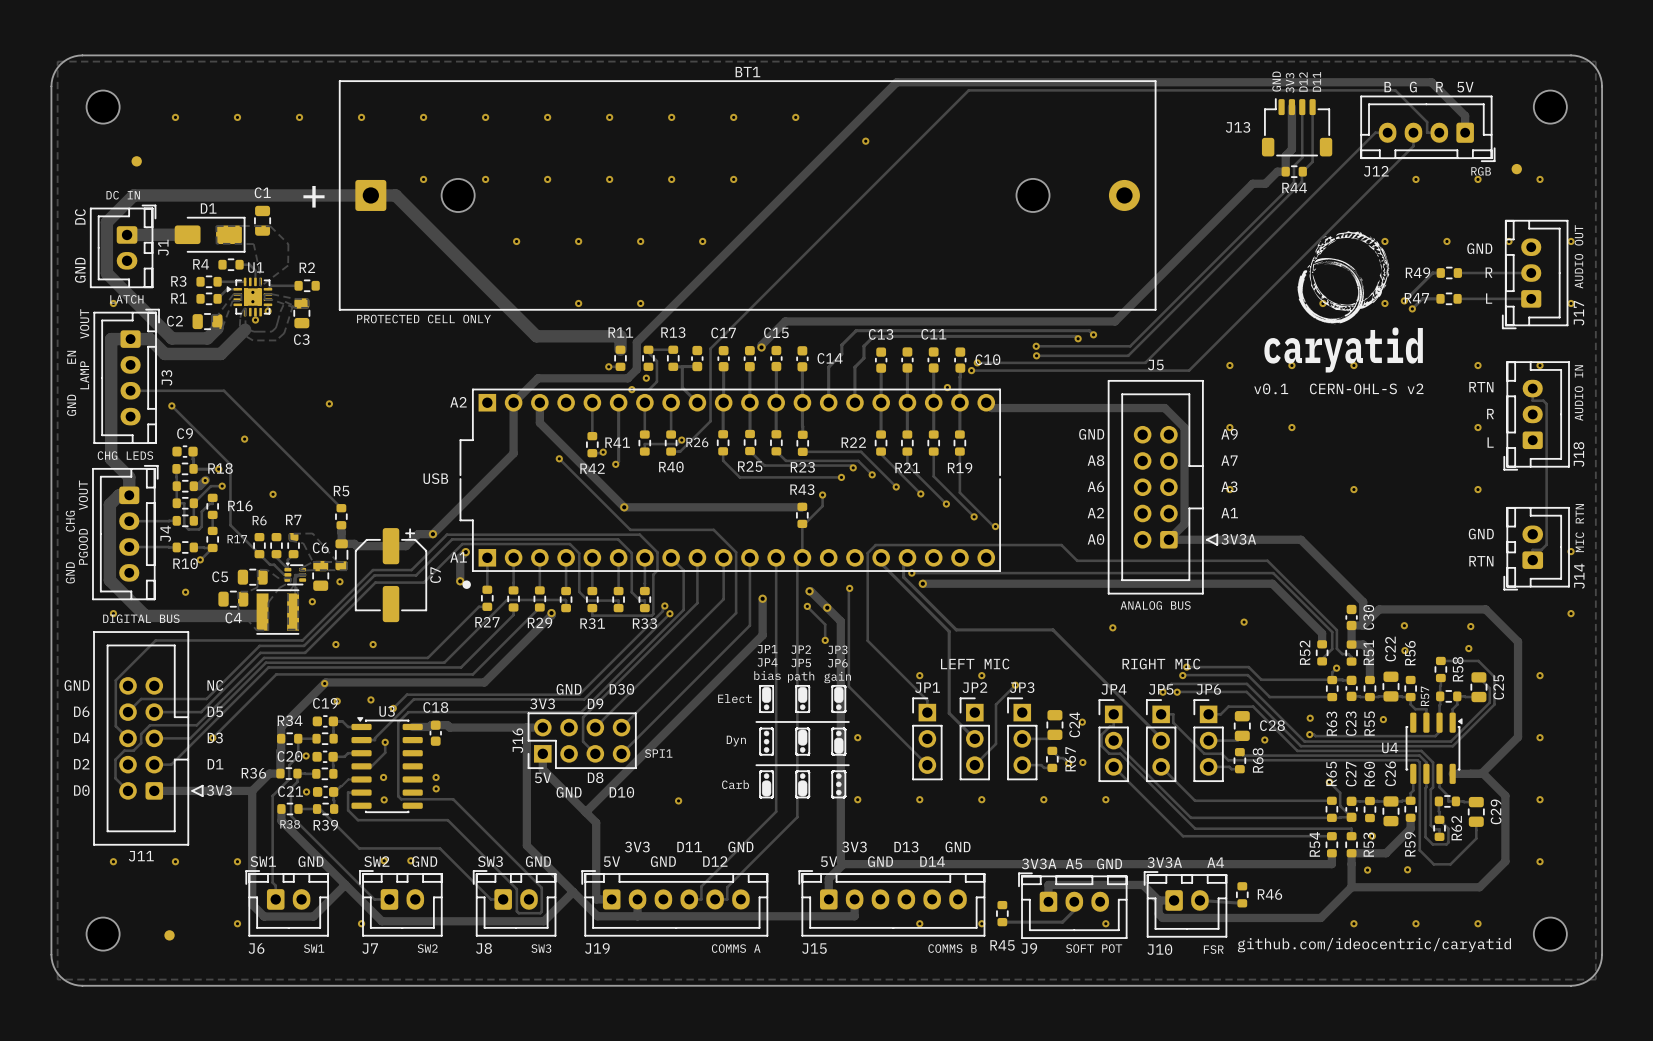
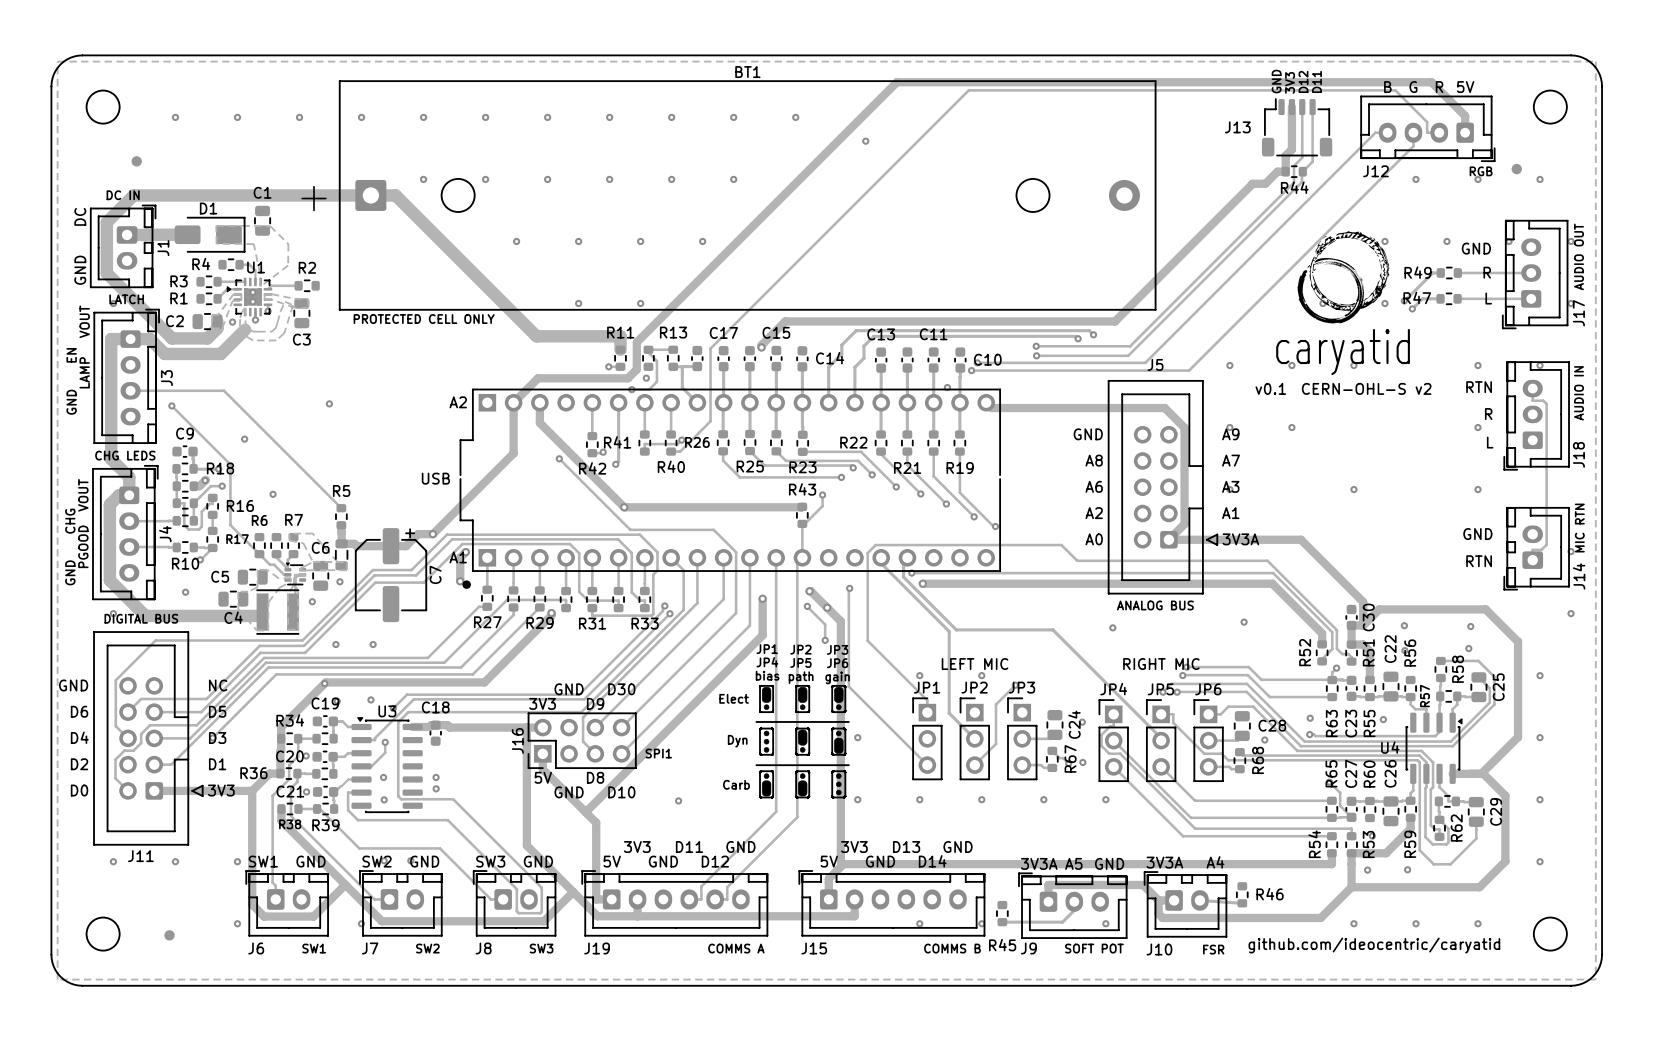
via: none -> (232, 322)

